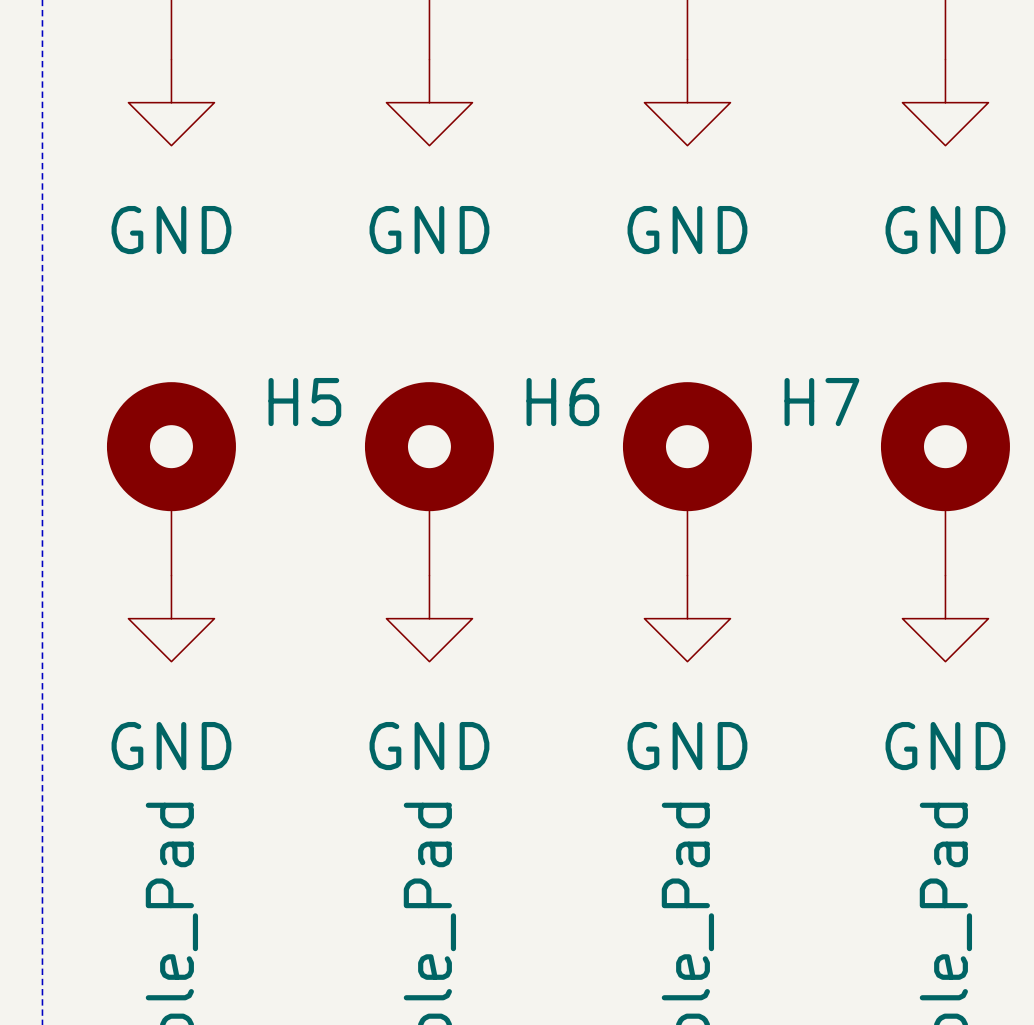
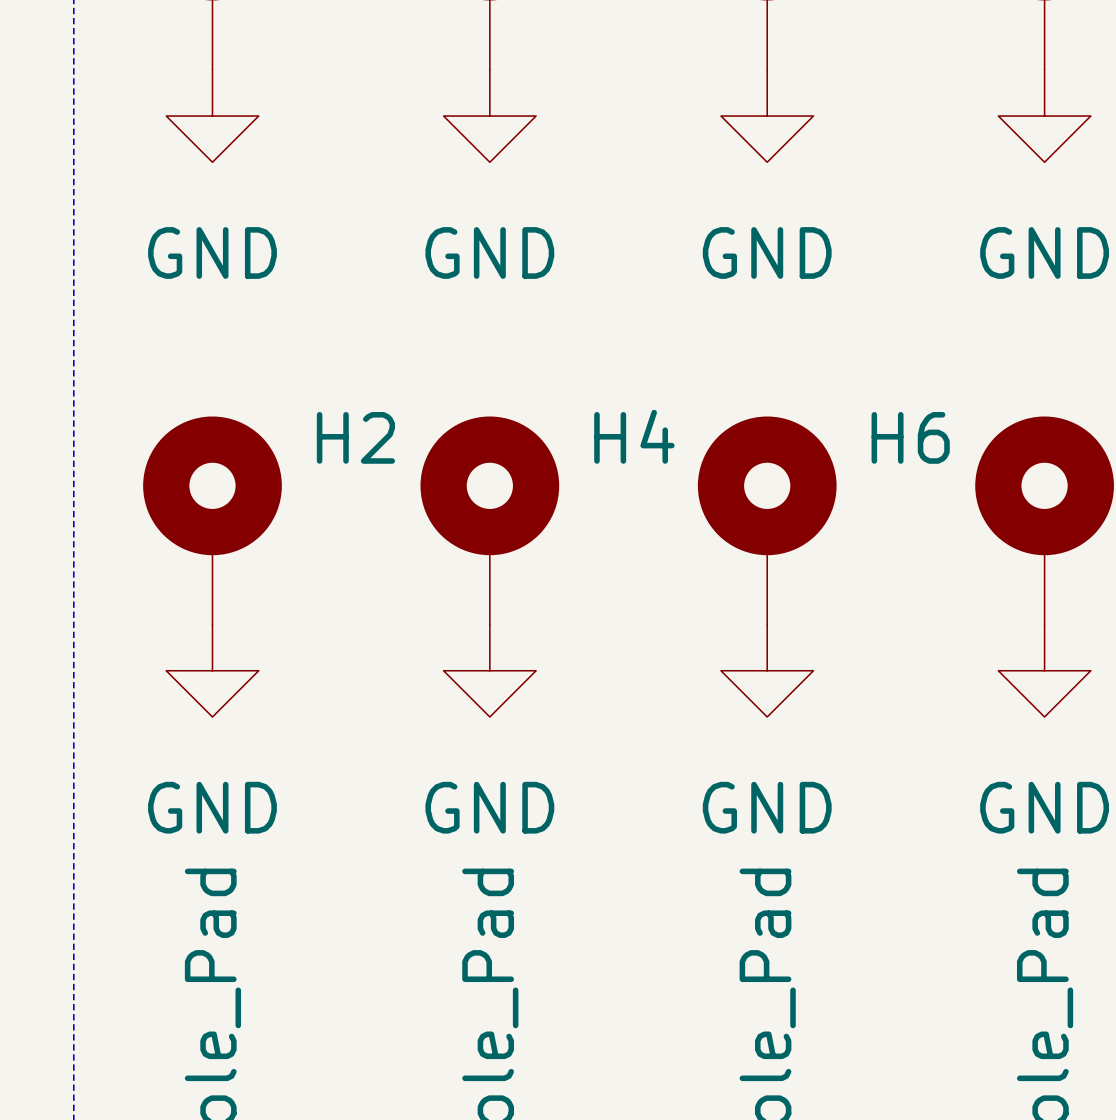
H5 name: H5 (304, 402) -> H2 (355, 437)
H6 name: H6 (562, 402) -> H4 (634, 436)
H7 name: H7 (821, 402) -> H6 (910, 437)

